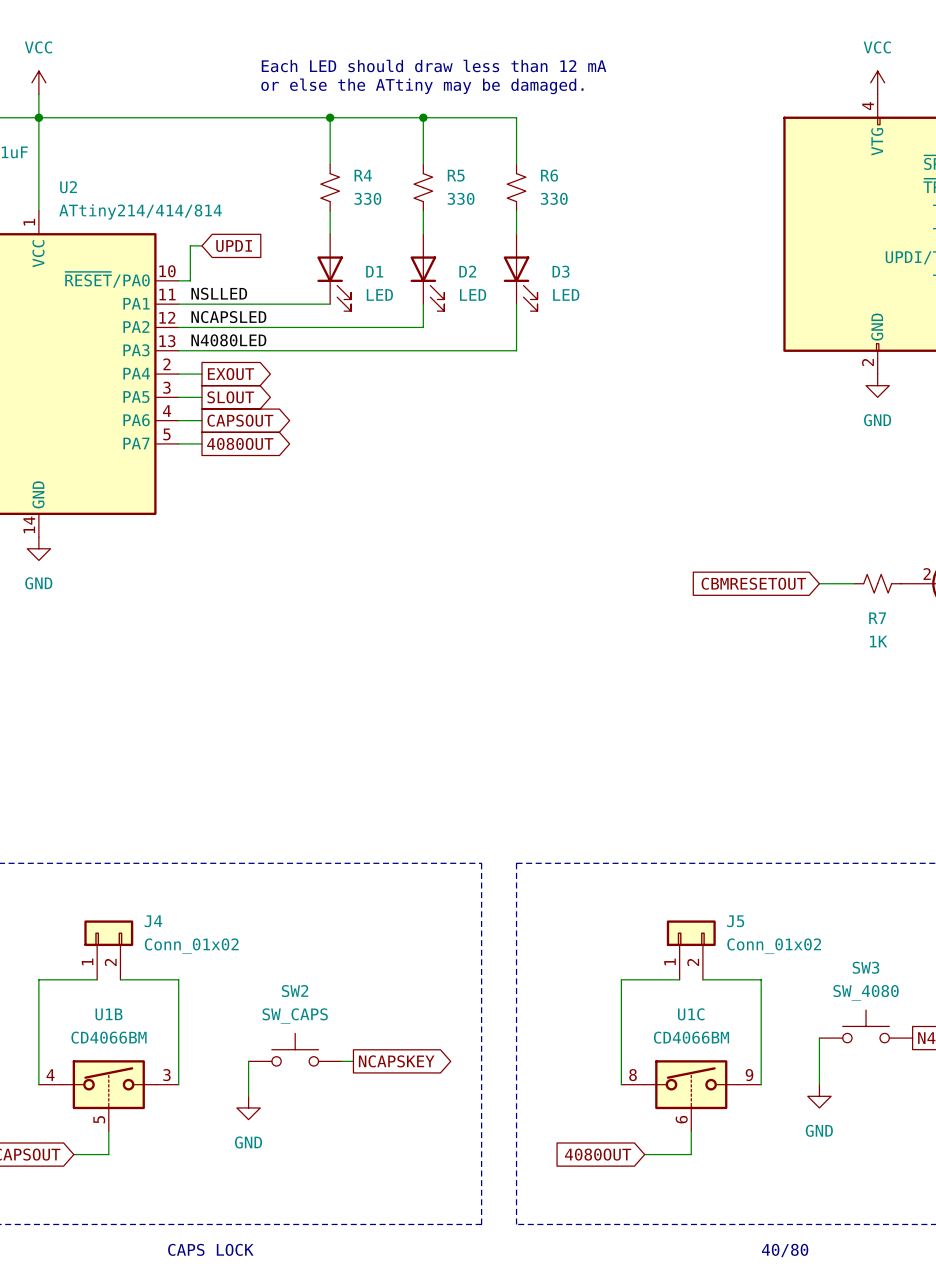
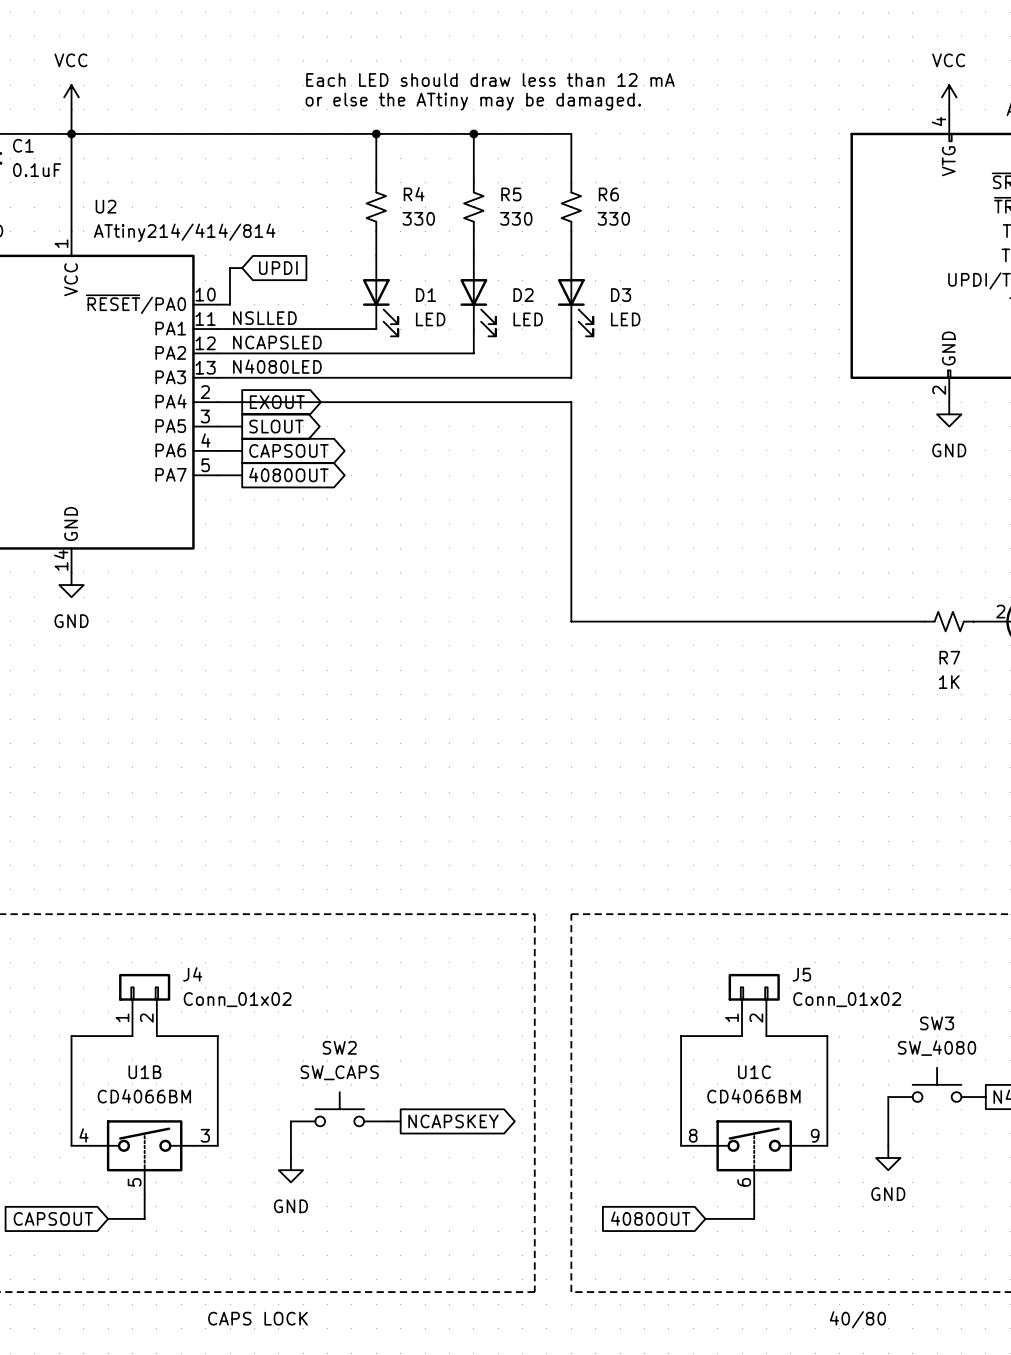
wire: none -> (242, 402) (571, 402) (571, 621) (888, 621)
global label: CBMRESETOUT (753, 583) -> none

